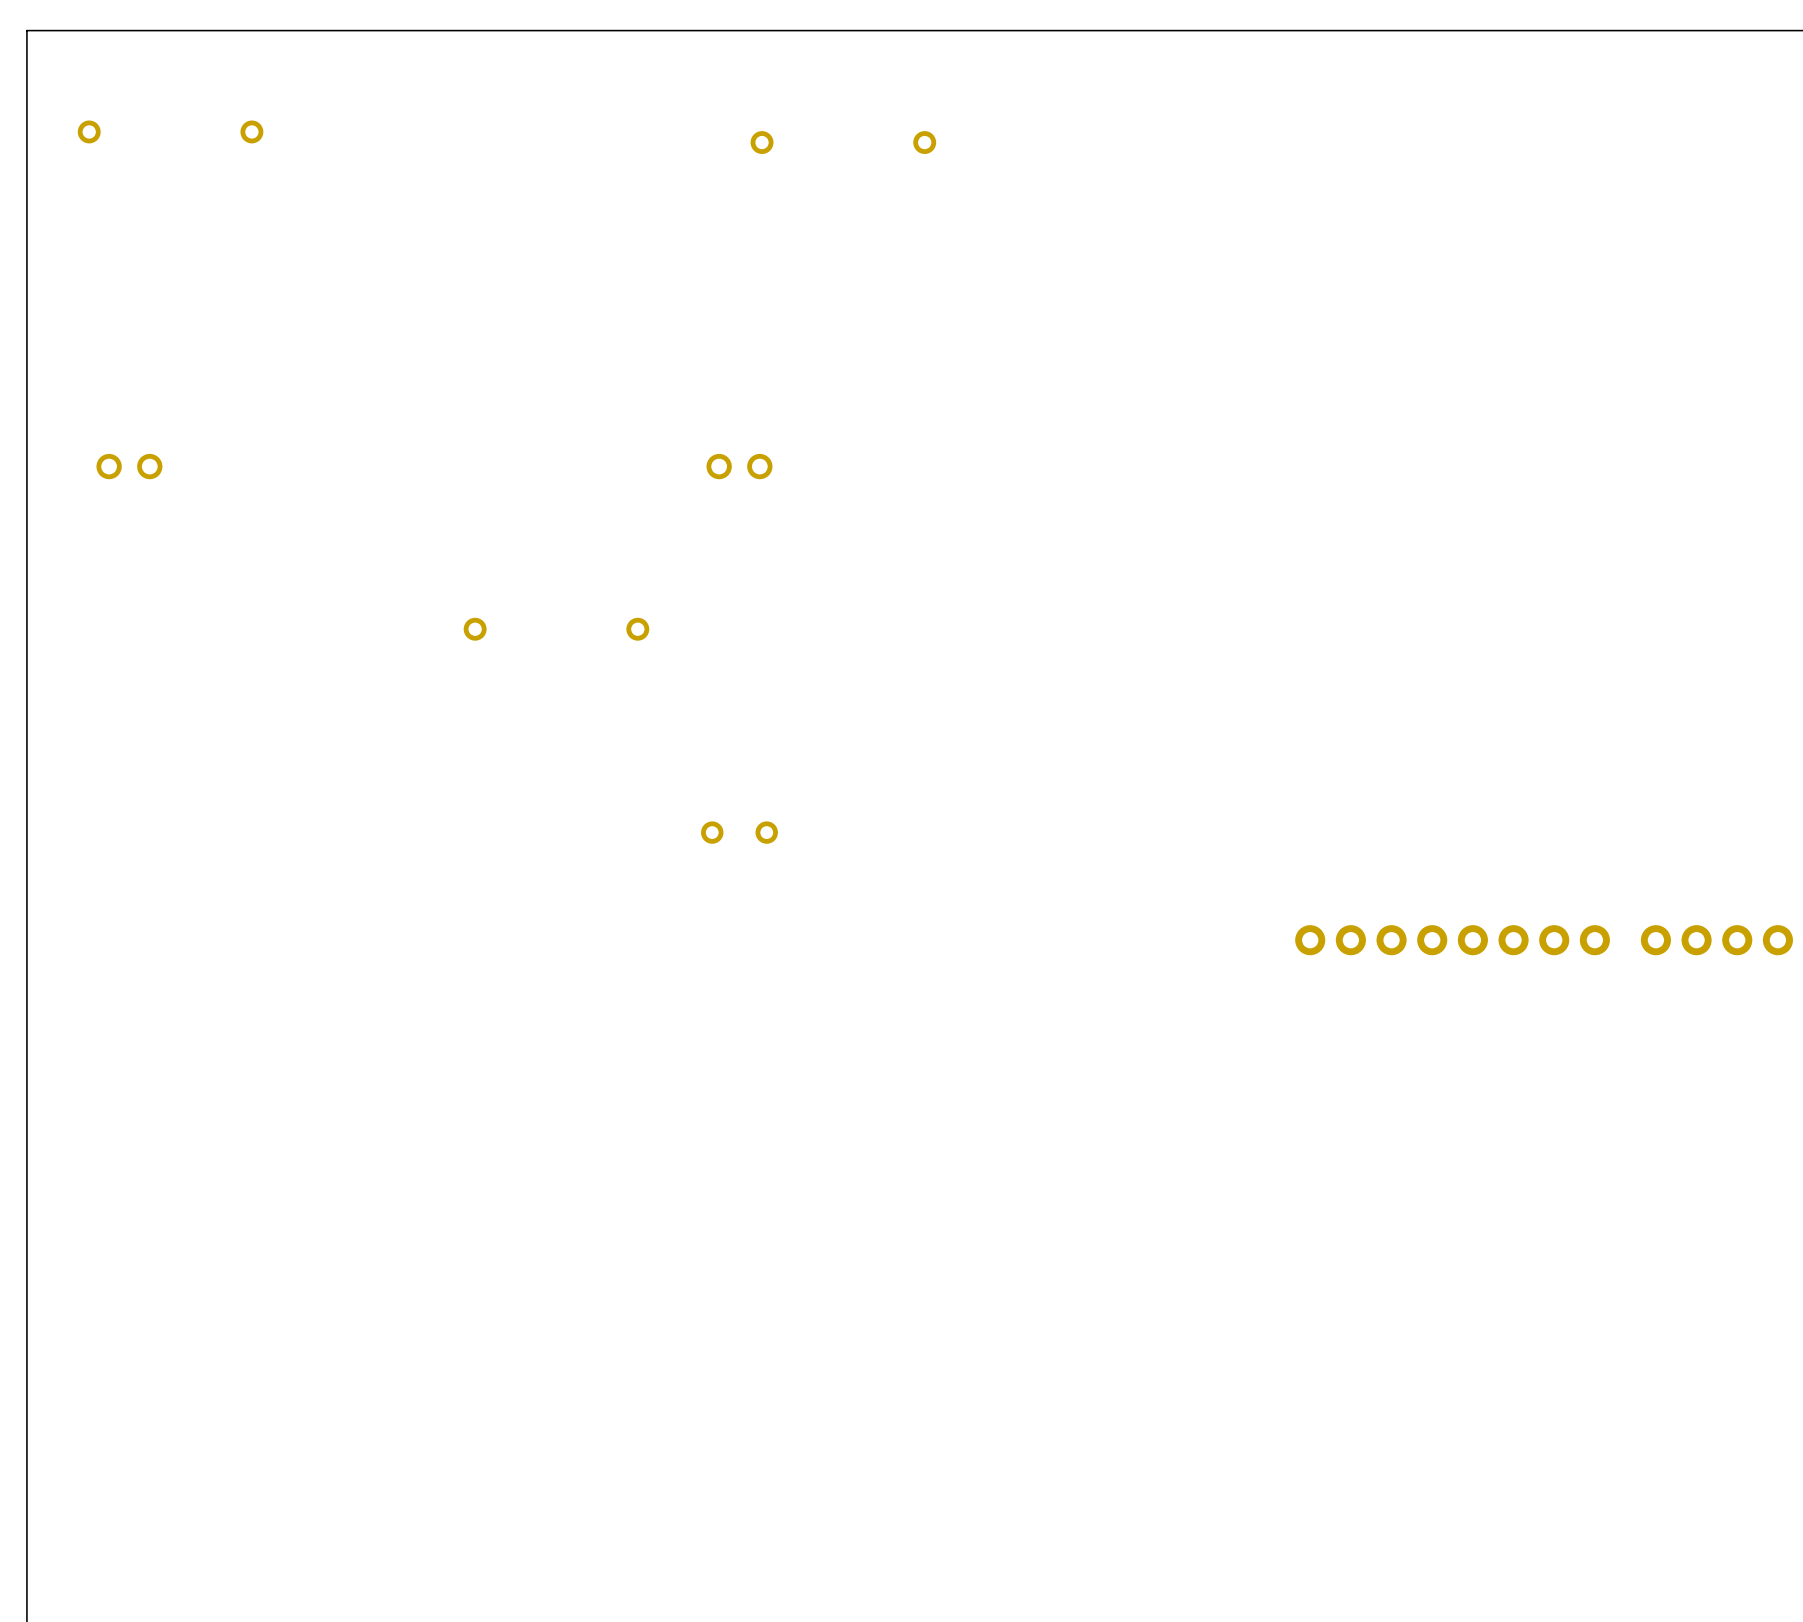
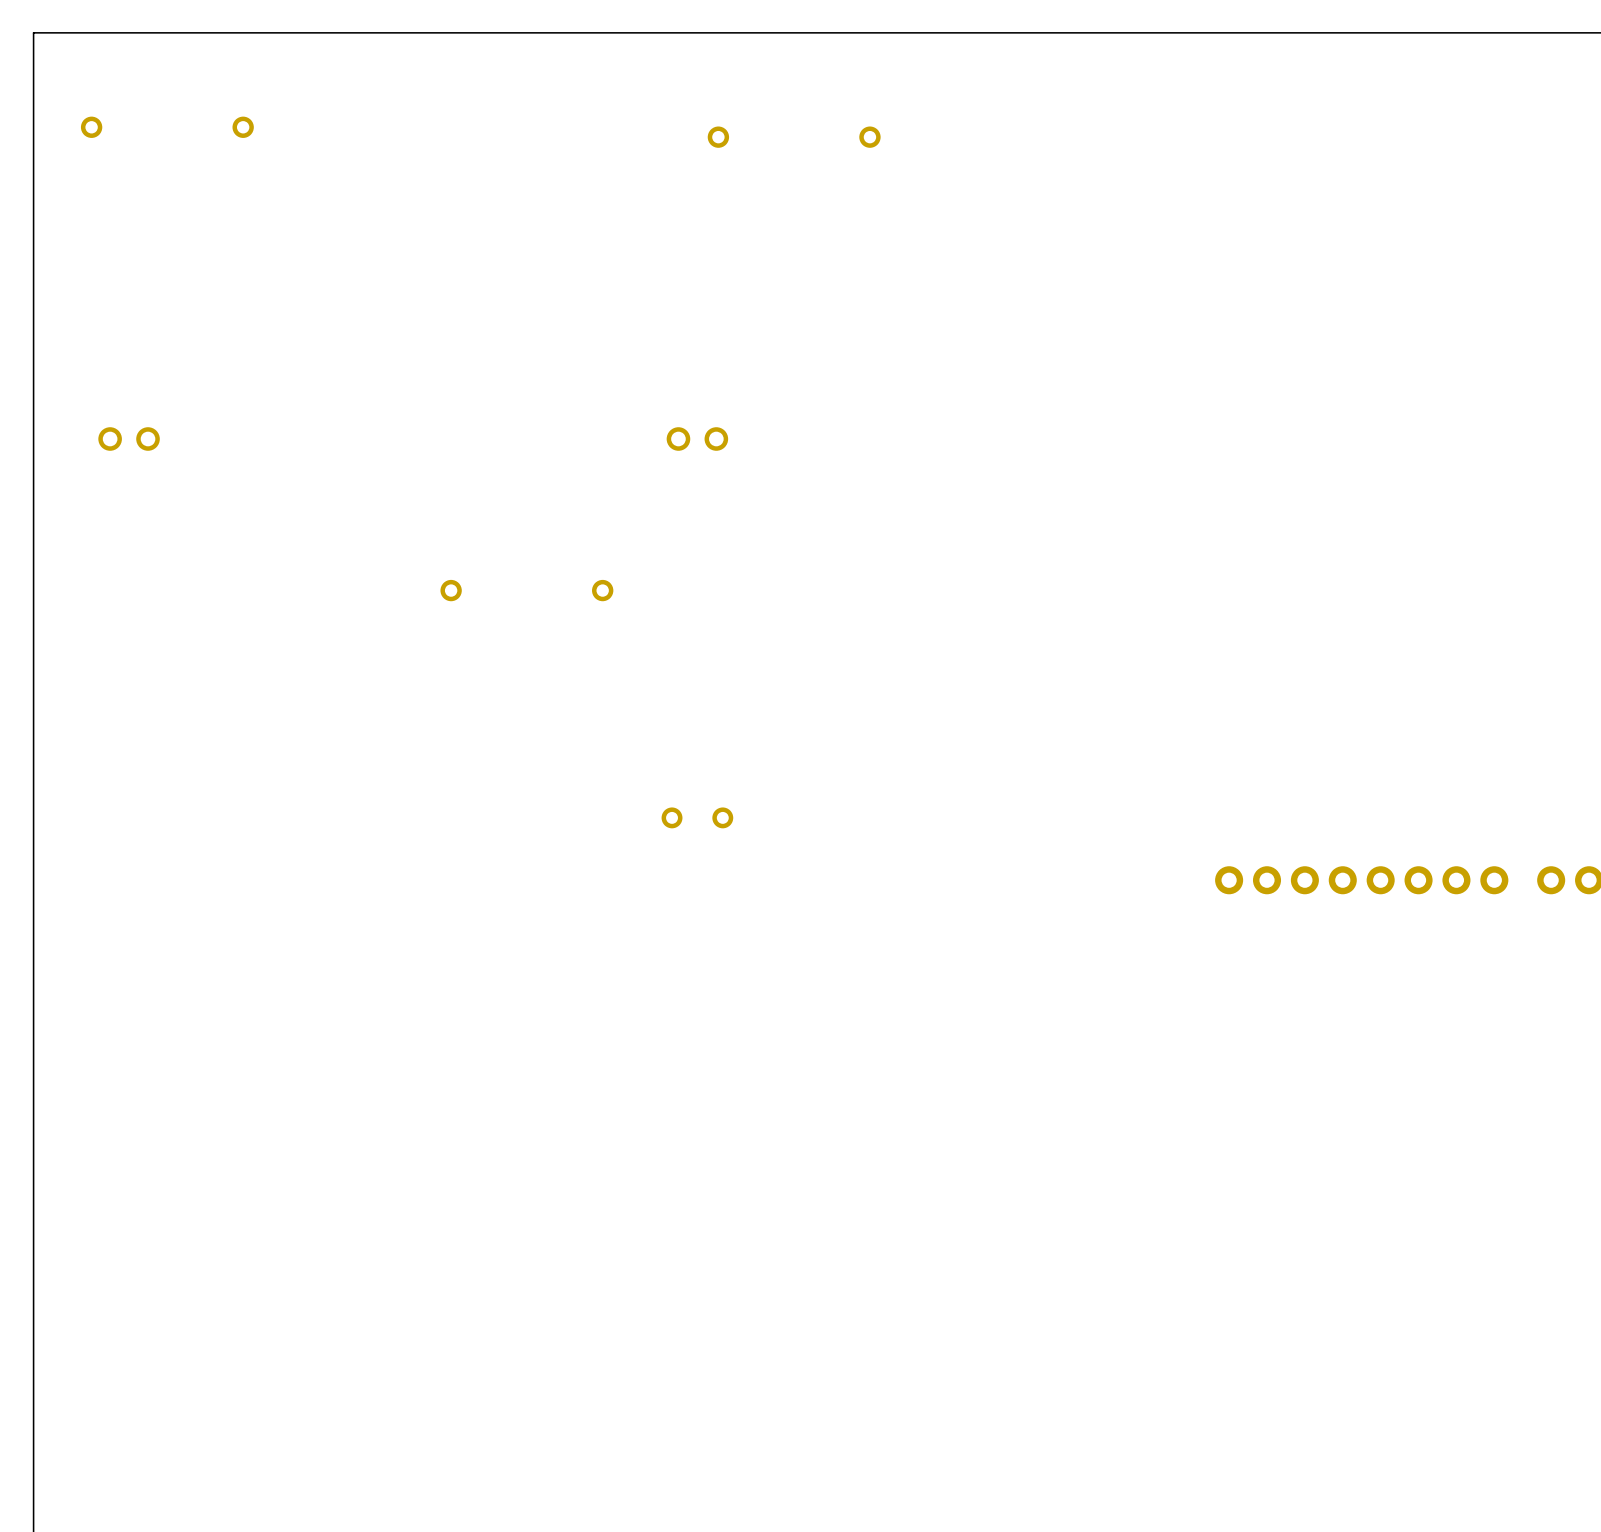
part position: (739, 832) -> (697, 817)

